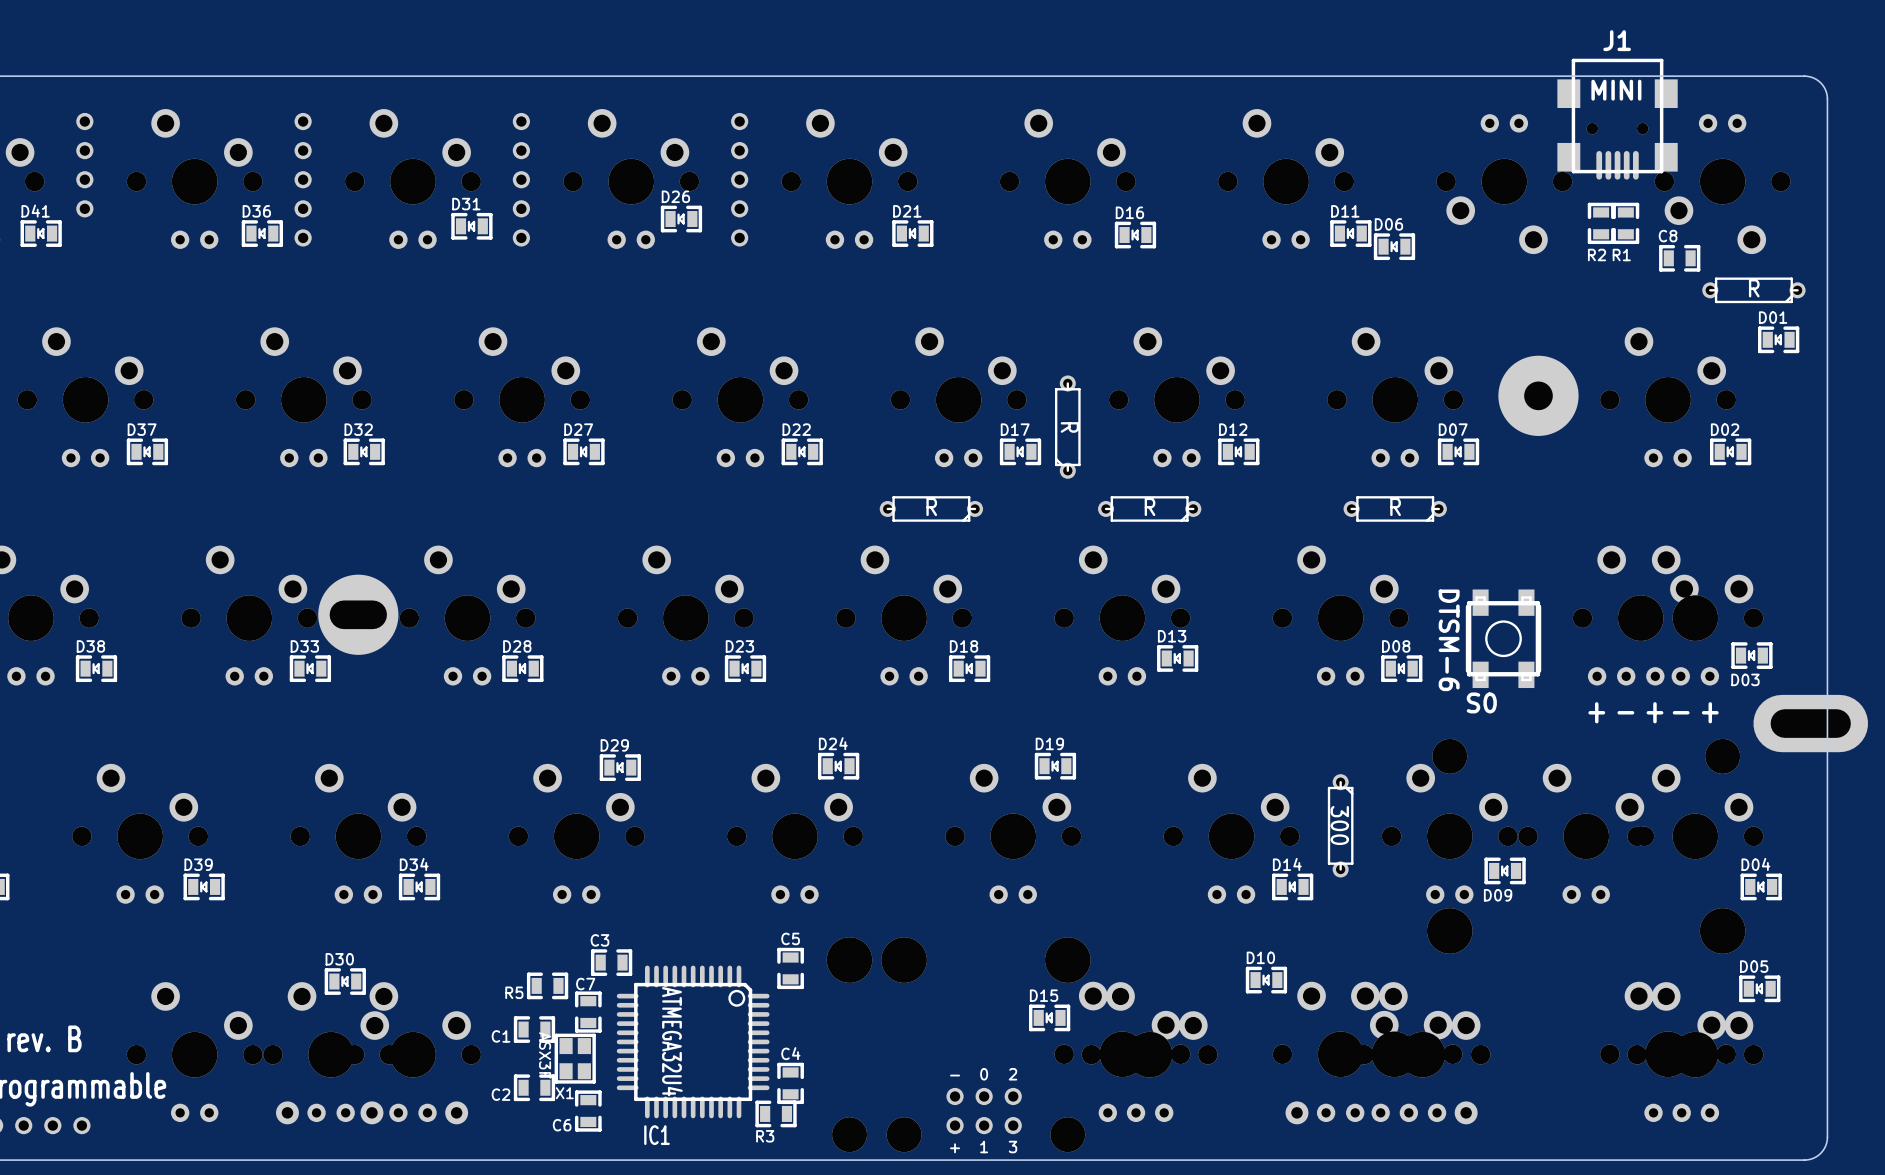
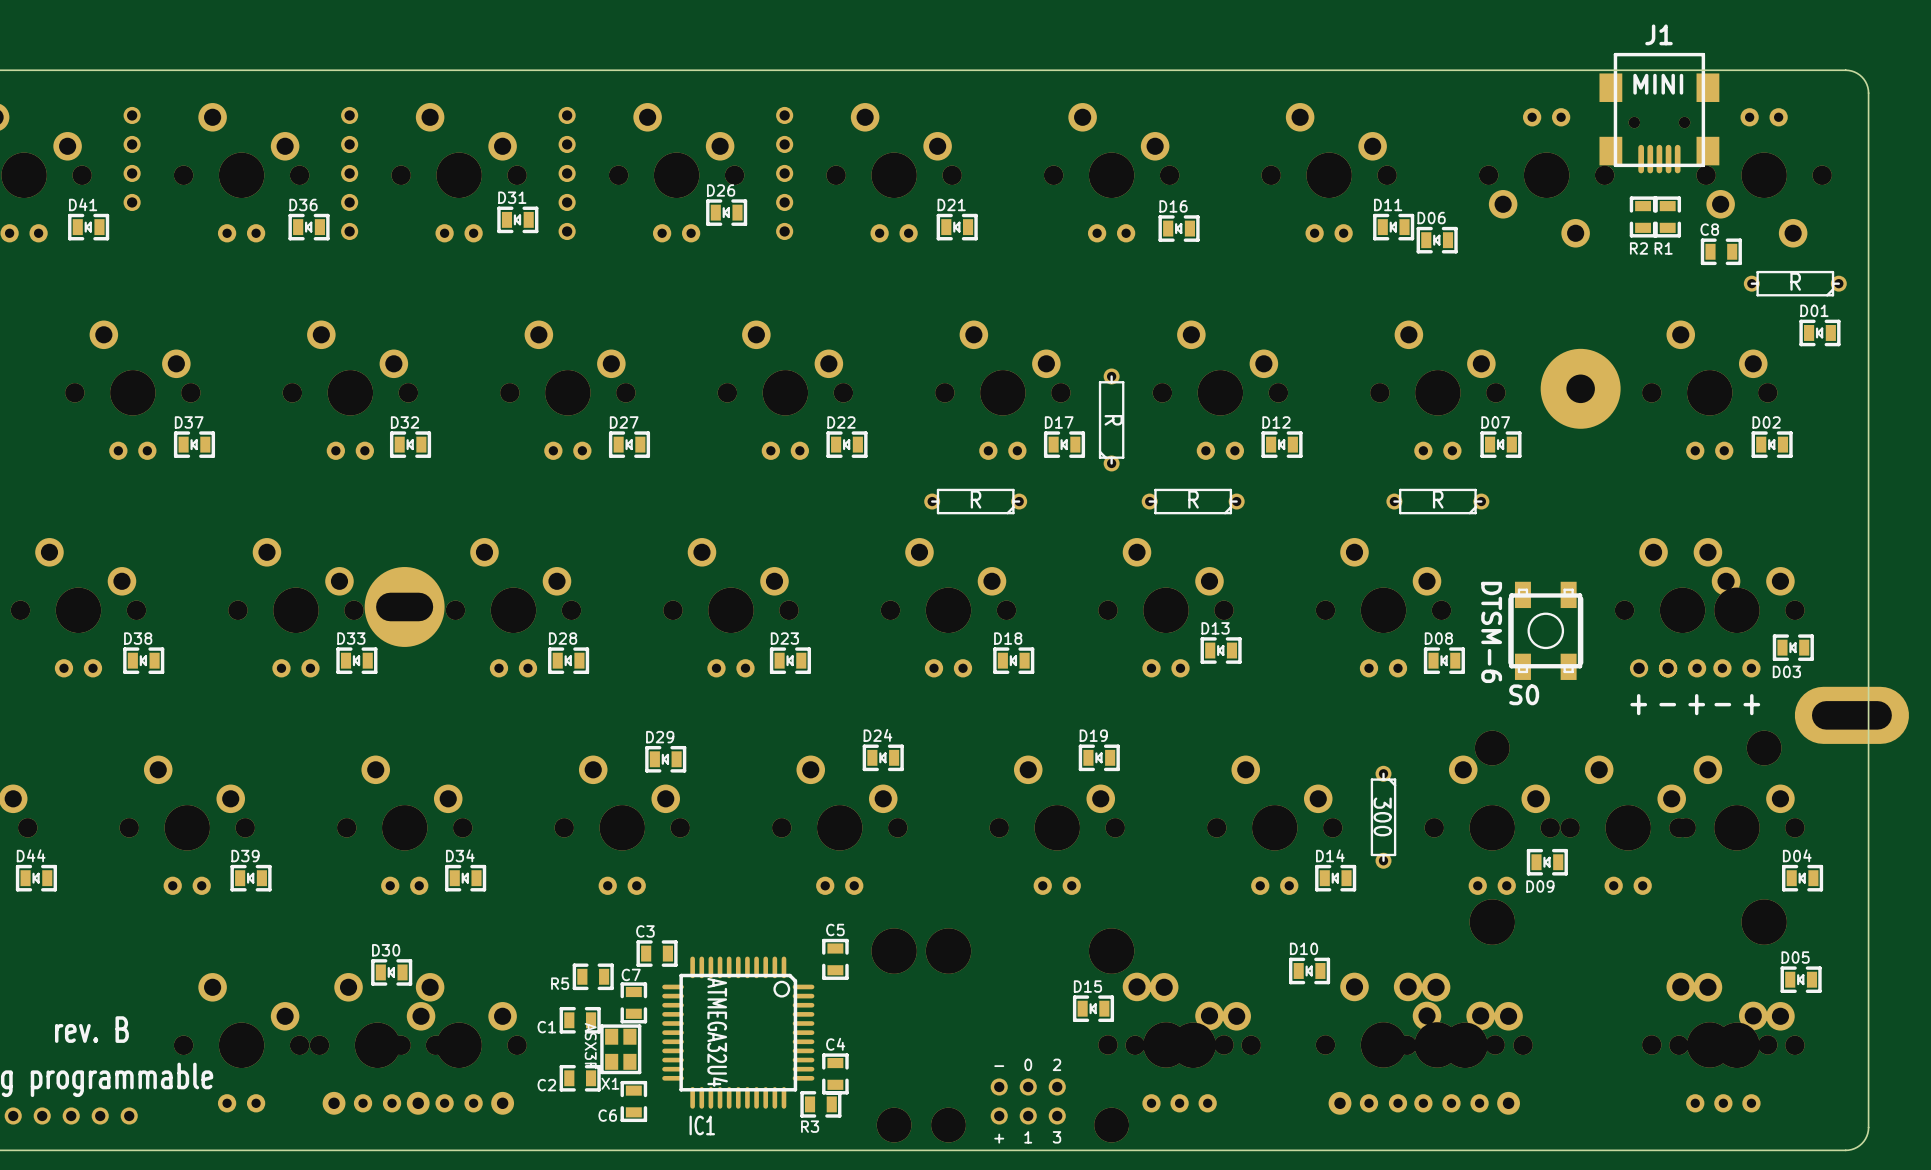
part: (1597, 676) -> none
part: none -> (1653, 668)

